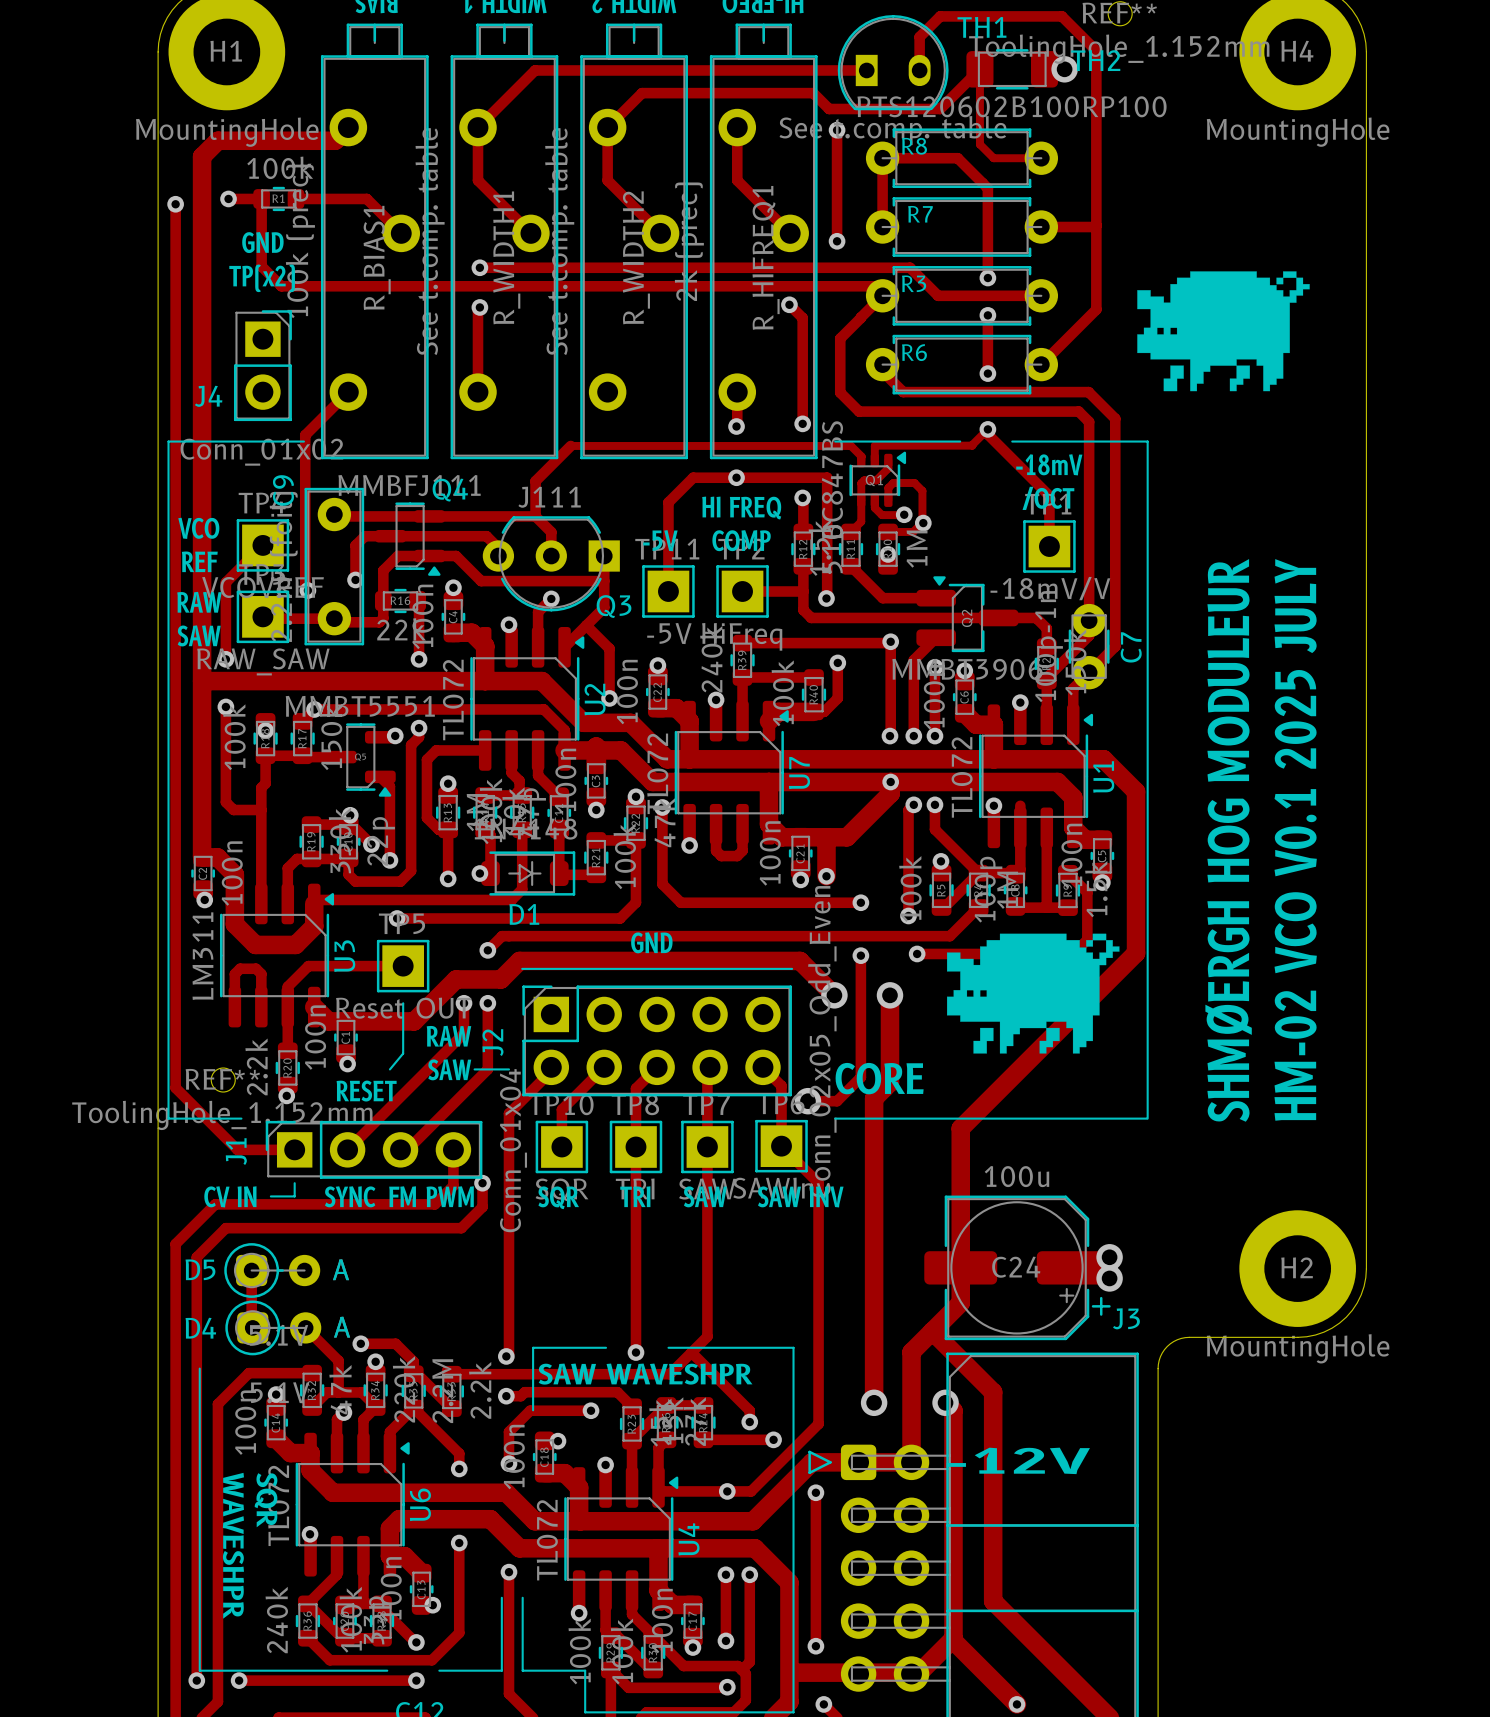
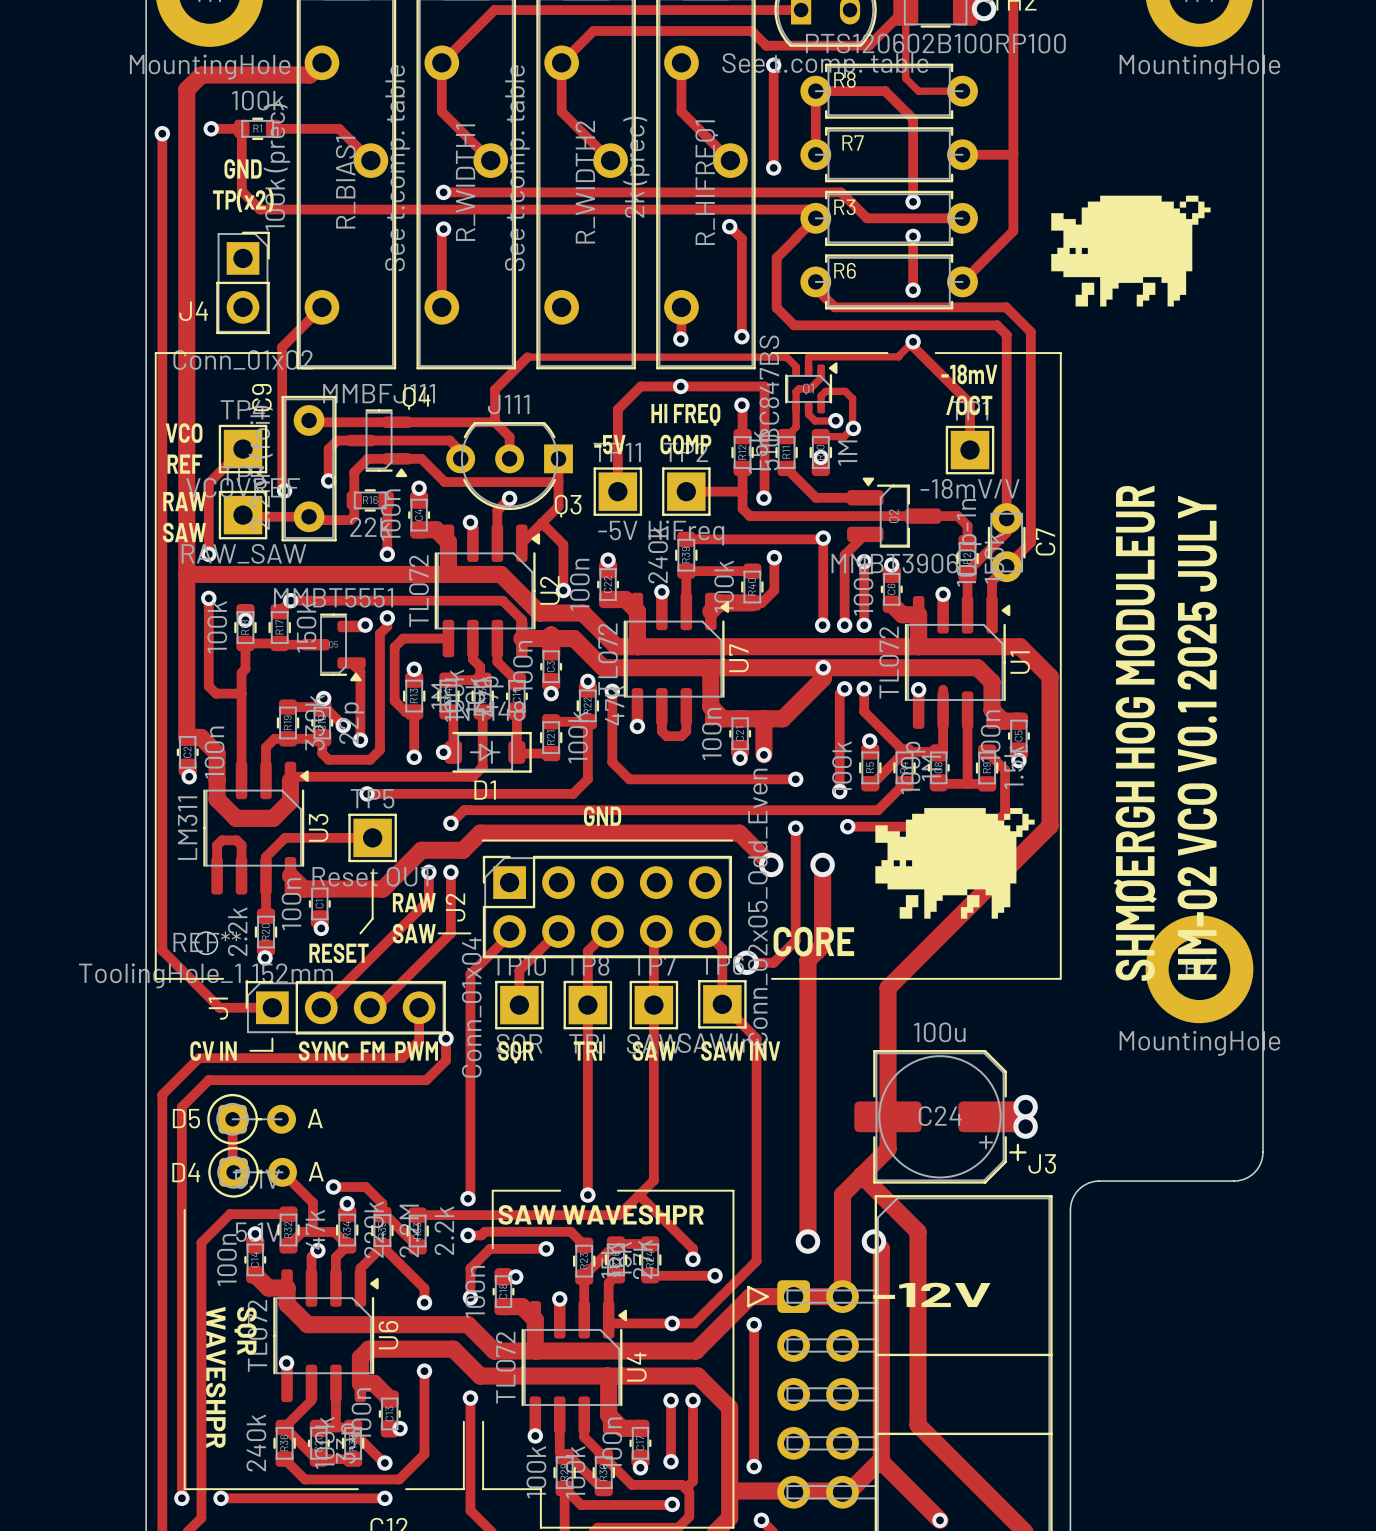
H2 position: (1297, 1268) -> (1199, 969)
board edge: (1366, 1268) (1361, 1294) (1346, 1317) (1323, 1332) (1297, 1337) -> (1262, 1117) (1262, 1155) (1254, 1172) (1237, 1180) (1199, 1181)

